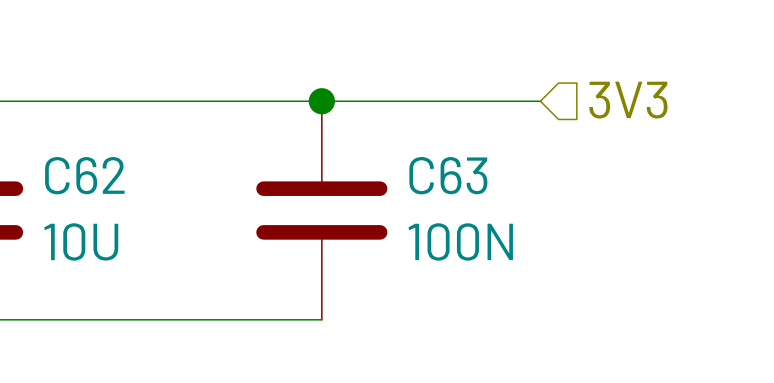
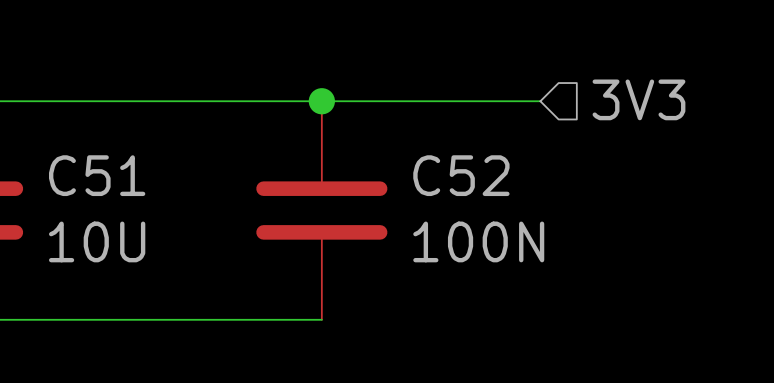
C62 name: C62 (84, 175) -> C51 (97, 175)
C63 name: C63 (448, 175) -> C52 (461, 175)

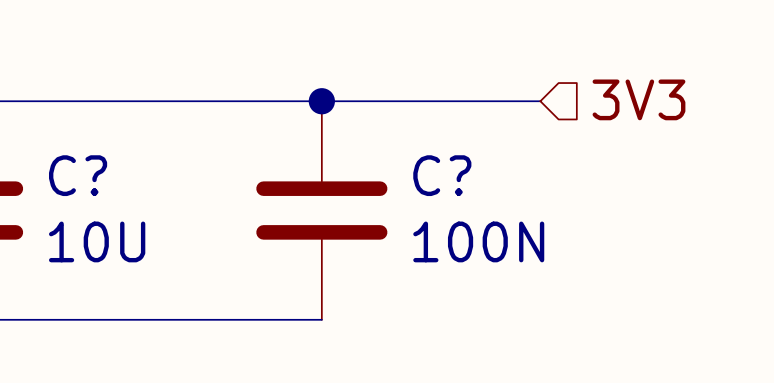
C51 name: C51 (97, 175) -> C? (78, 175)
C52 name: C52 (461, 175) -> C? (442, 175)

